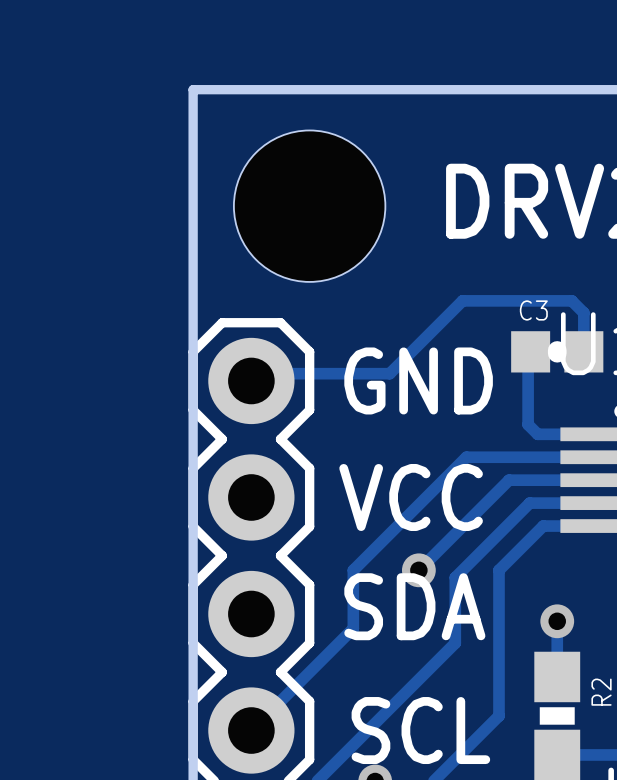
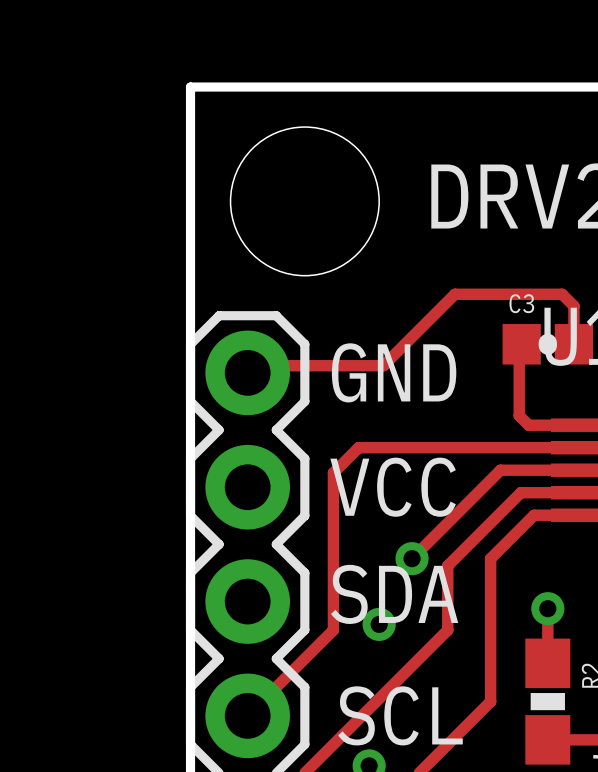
track: (466, 457) (353, 570) (353, 628) (338, 643) -> (458, 447) (358, 447) (333, 472) (333, 630)
via: none -> (379, 624)

